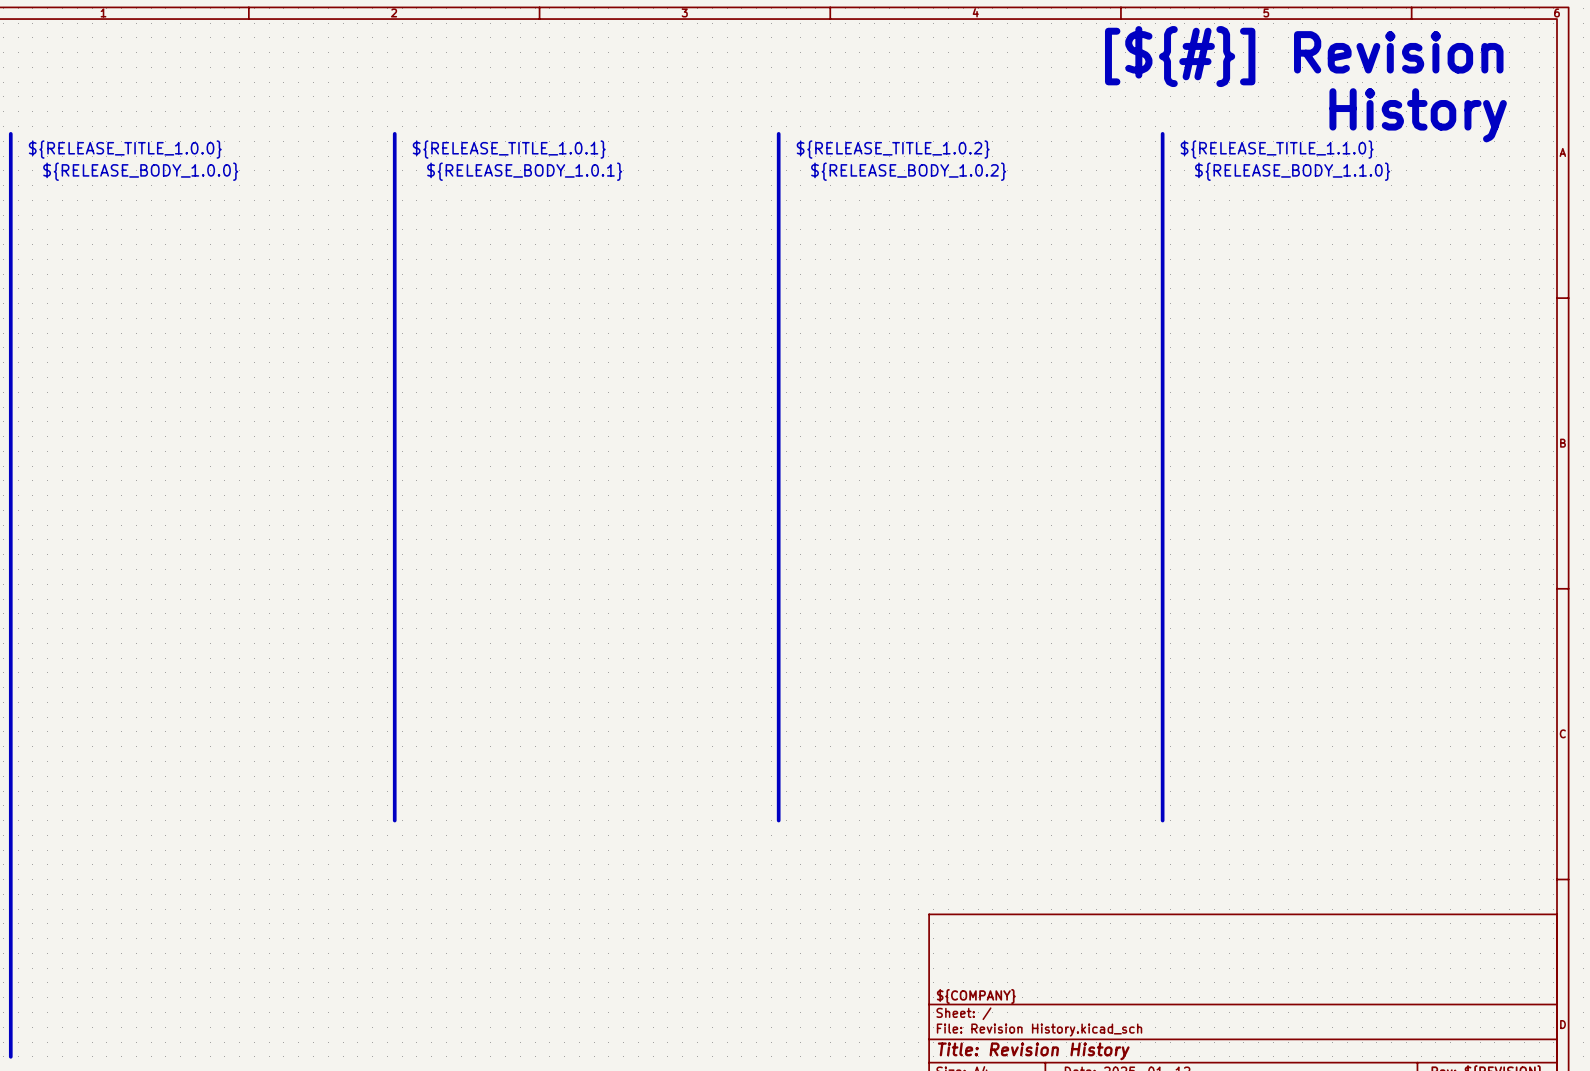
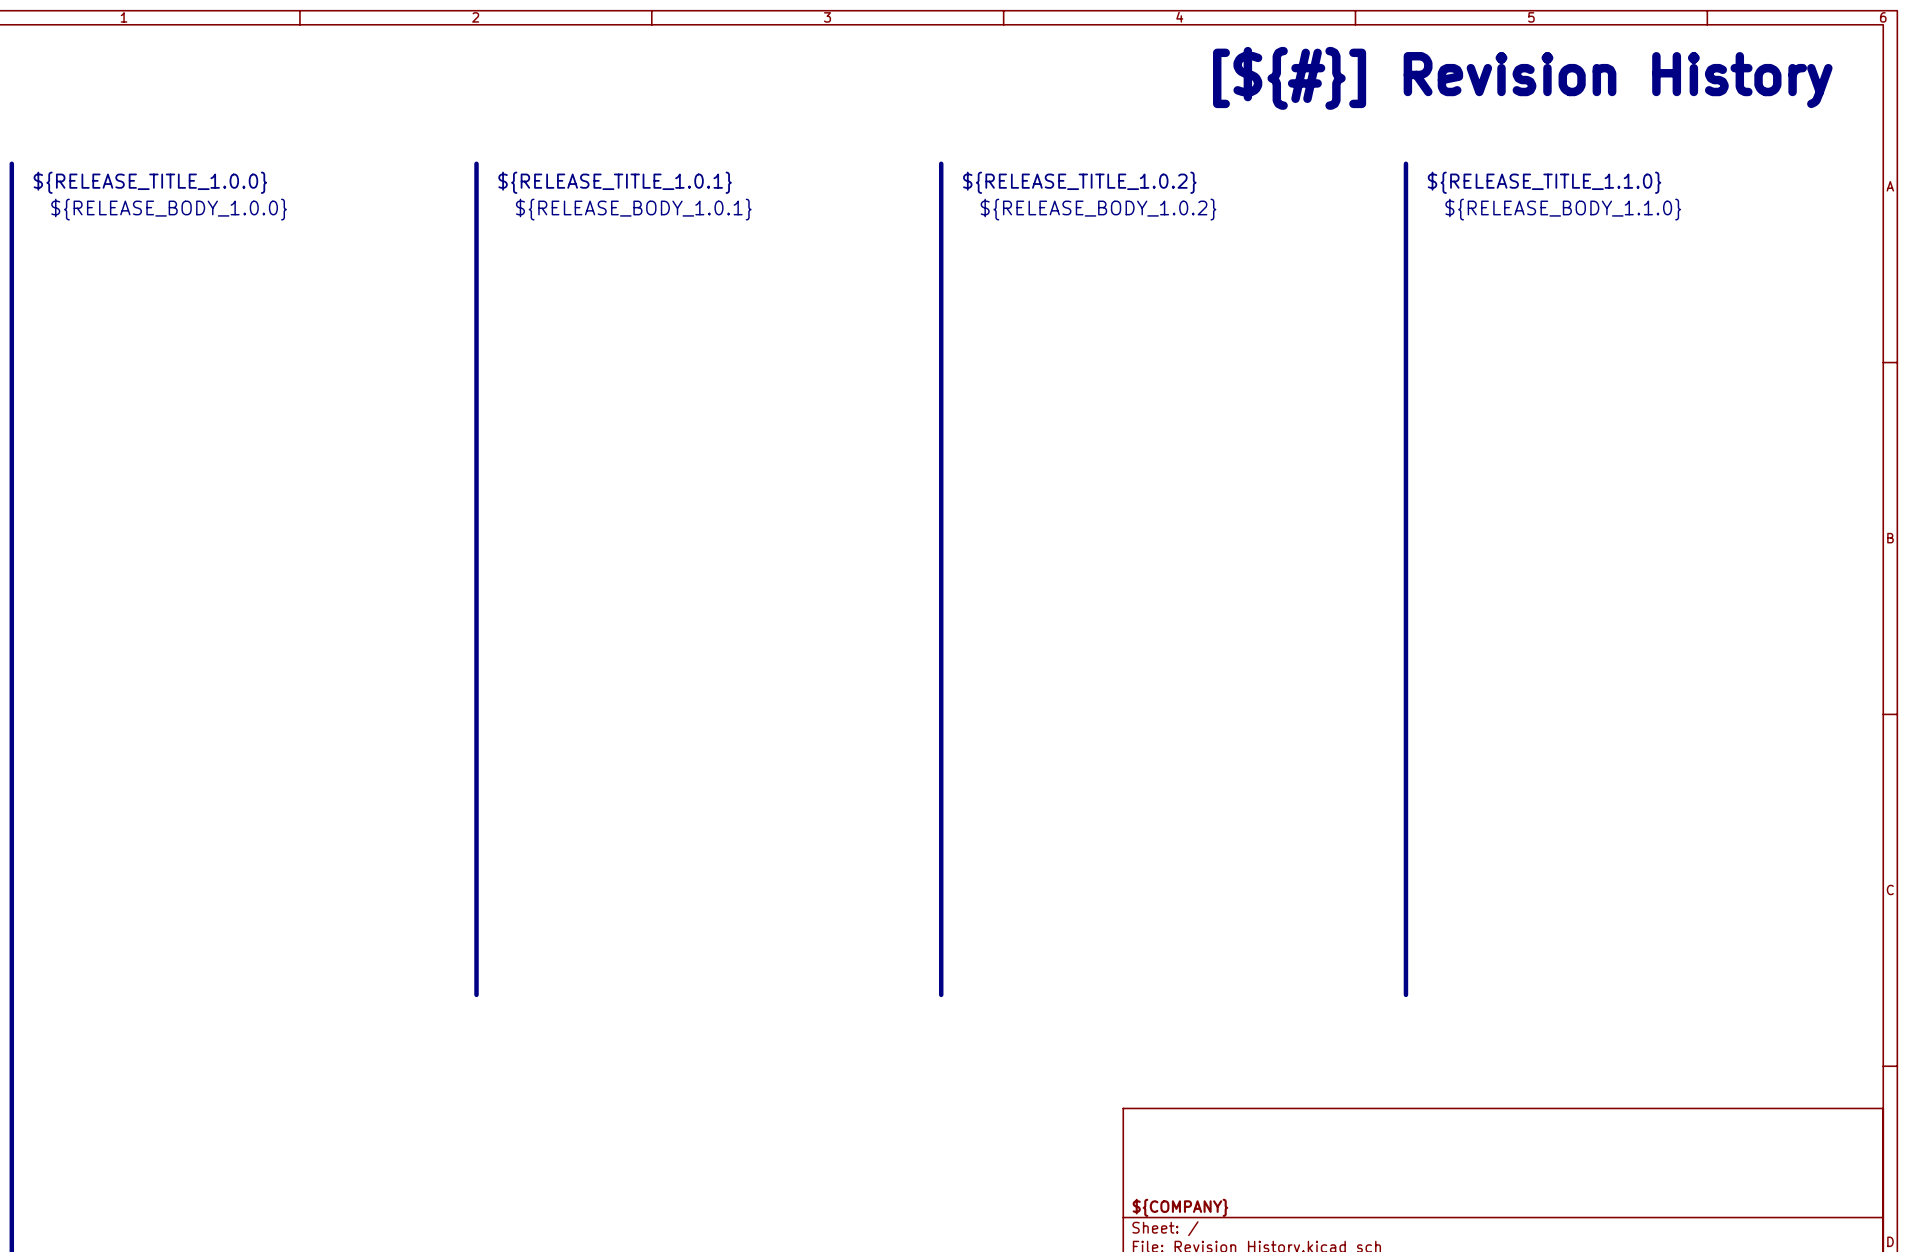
text: [${#}] Revision (1304, 56) -> [${#}] Revision History (1522, 78)
text: History (1418, 115) -> none

